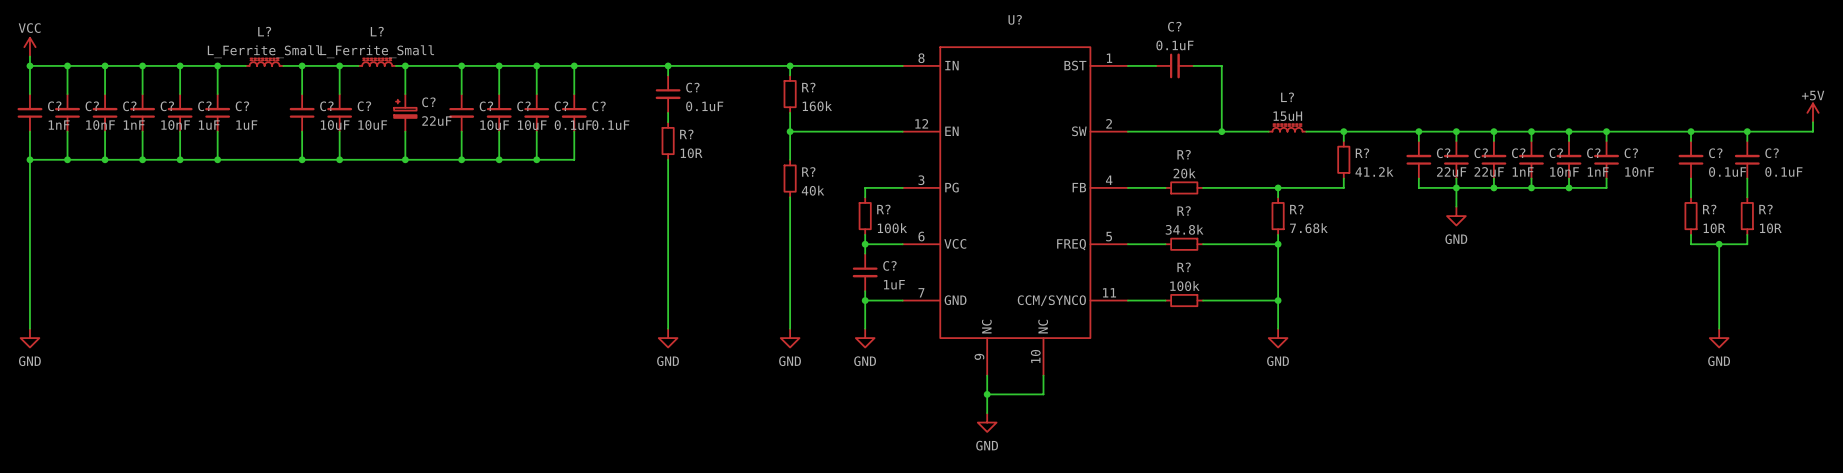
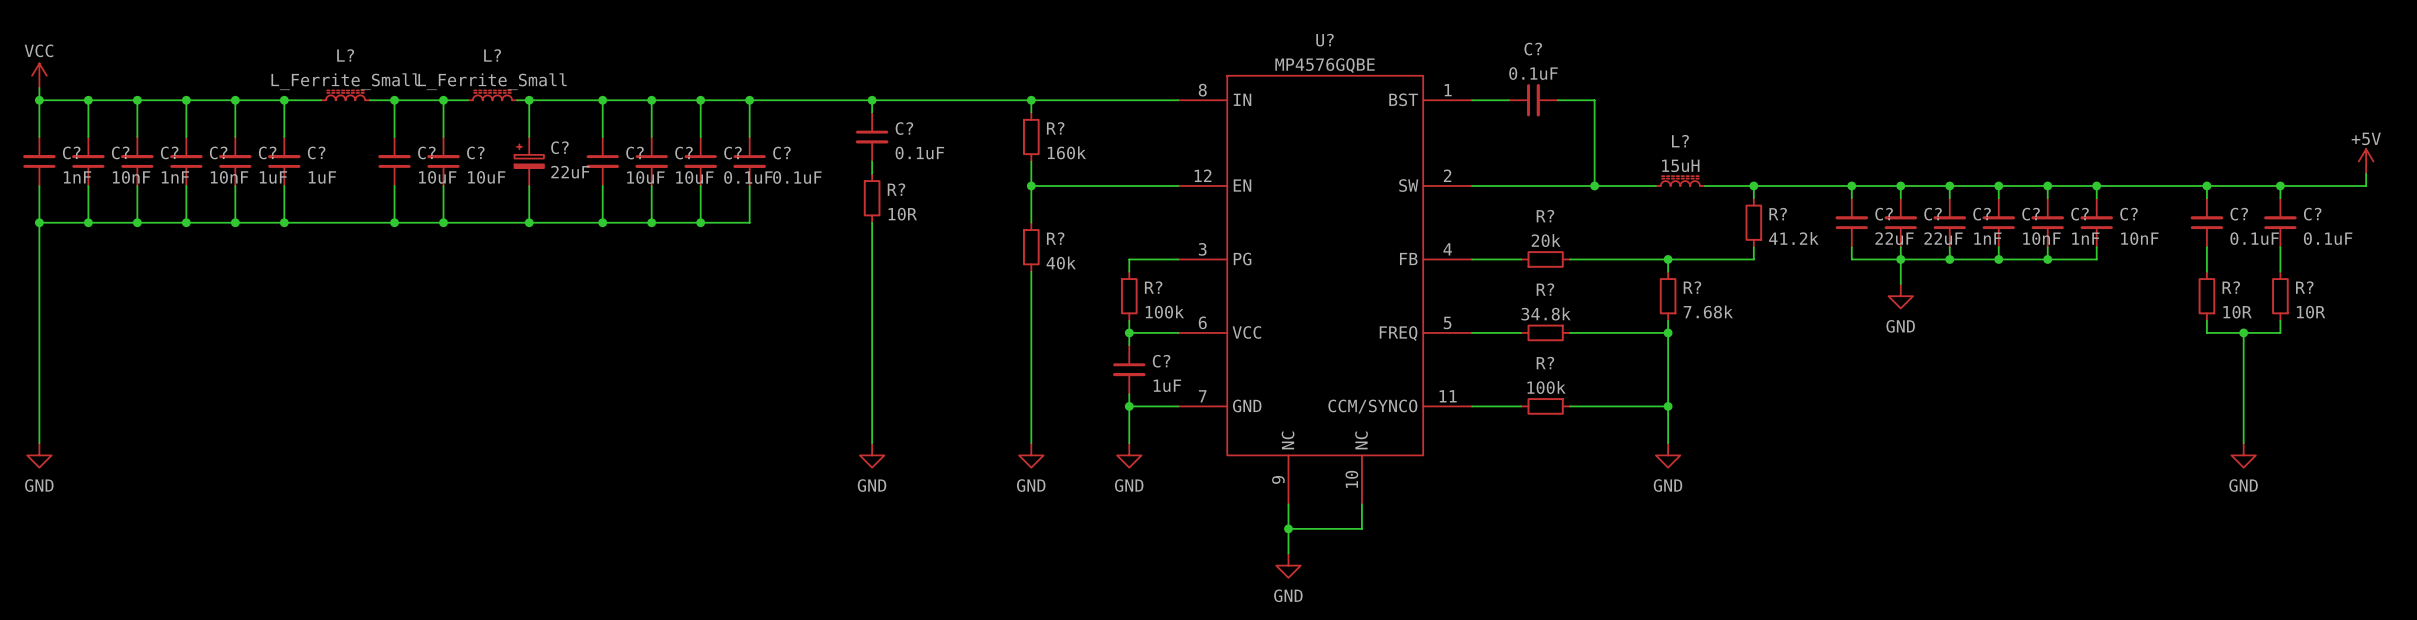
U? value: none -> MP4576GQBE (1325, 65)

